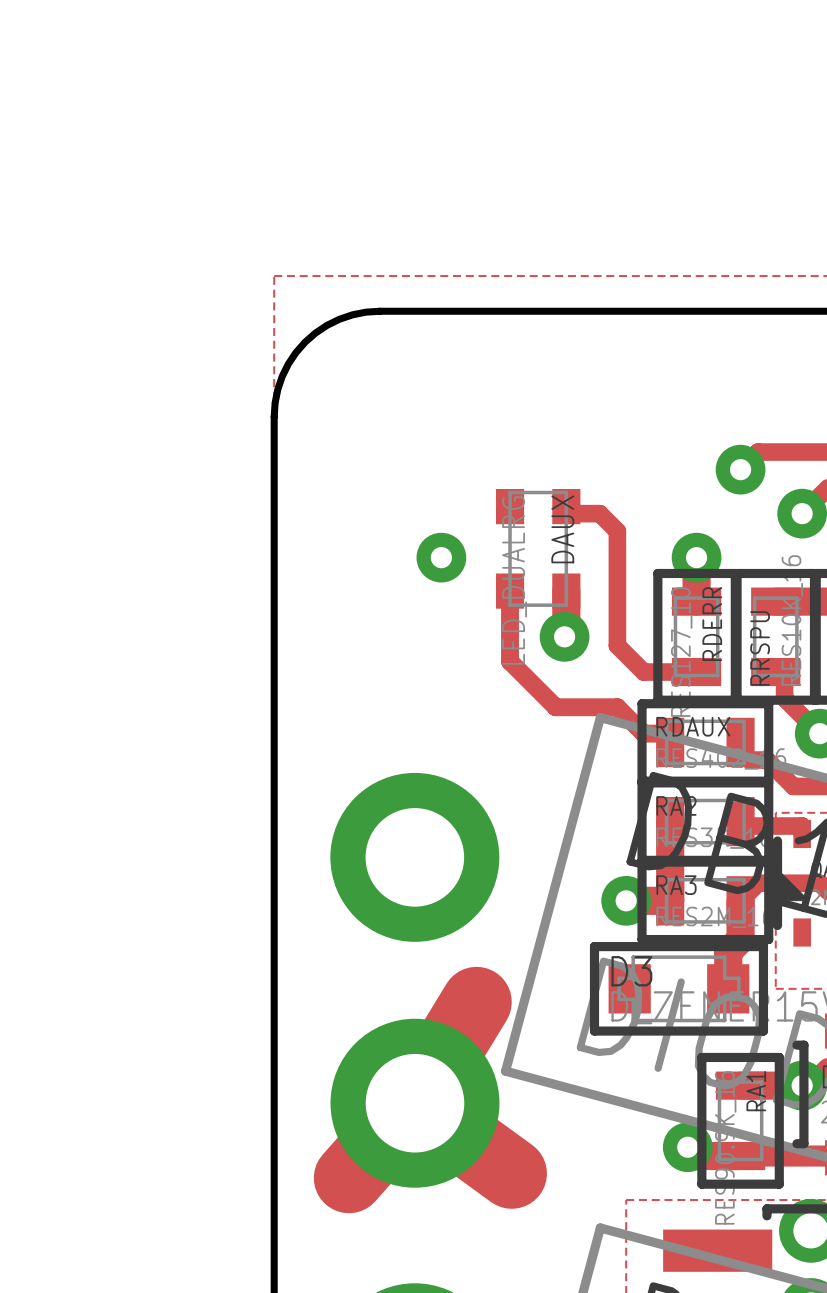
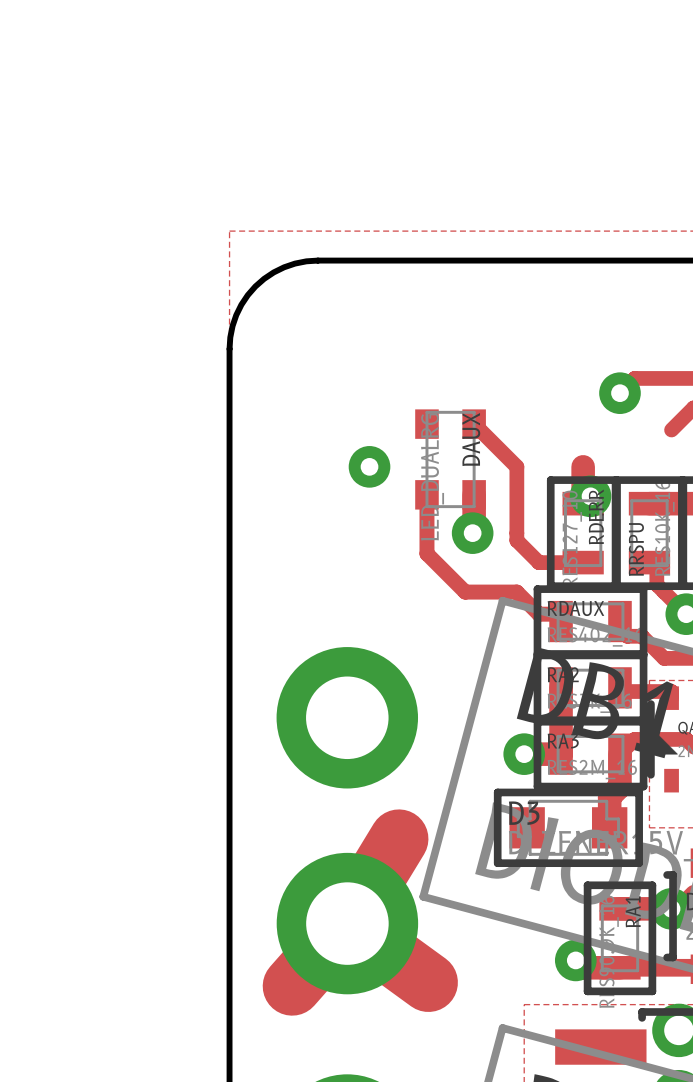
track: (573, 513) (599, 513) (617, 531) (617, 557) -> (480, 430) (516, 466)
via: (802, 513) -> none
via position: (696, 557) -> (590, 496)

